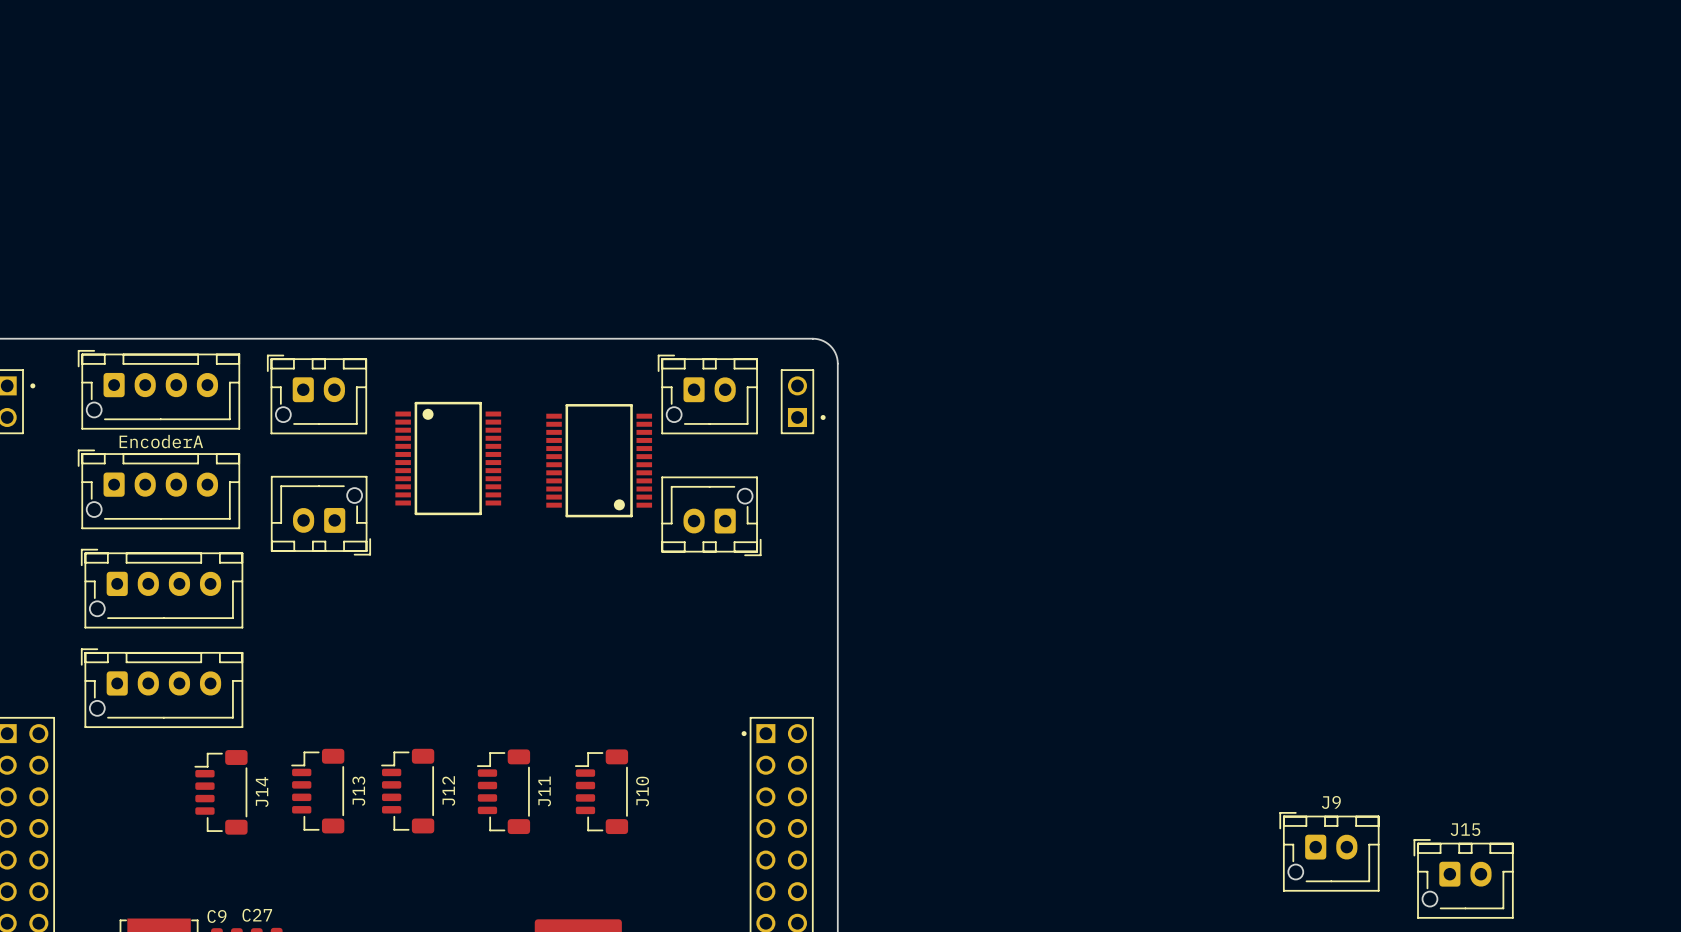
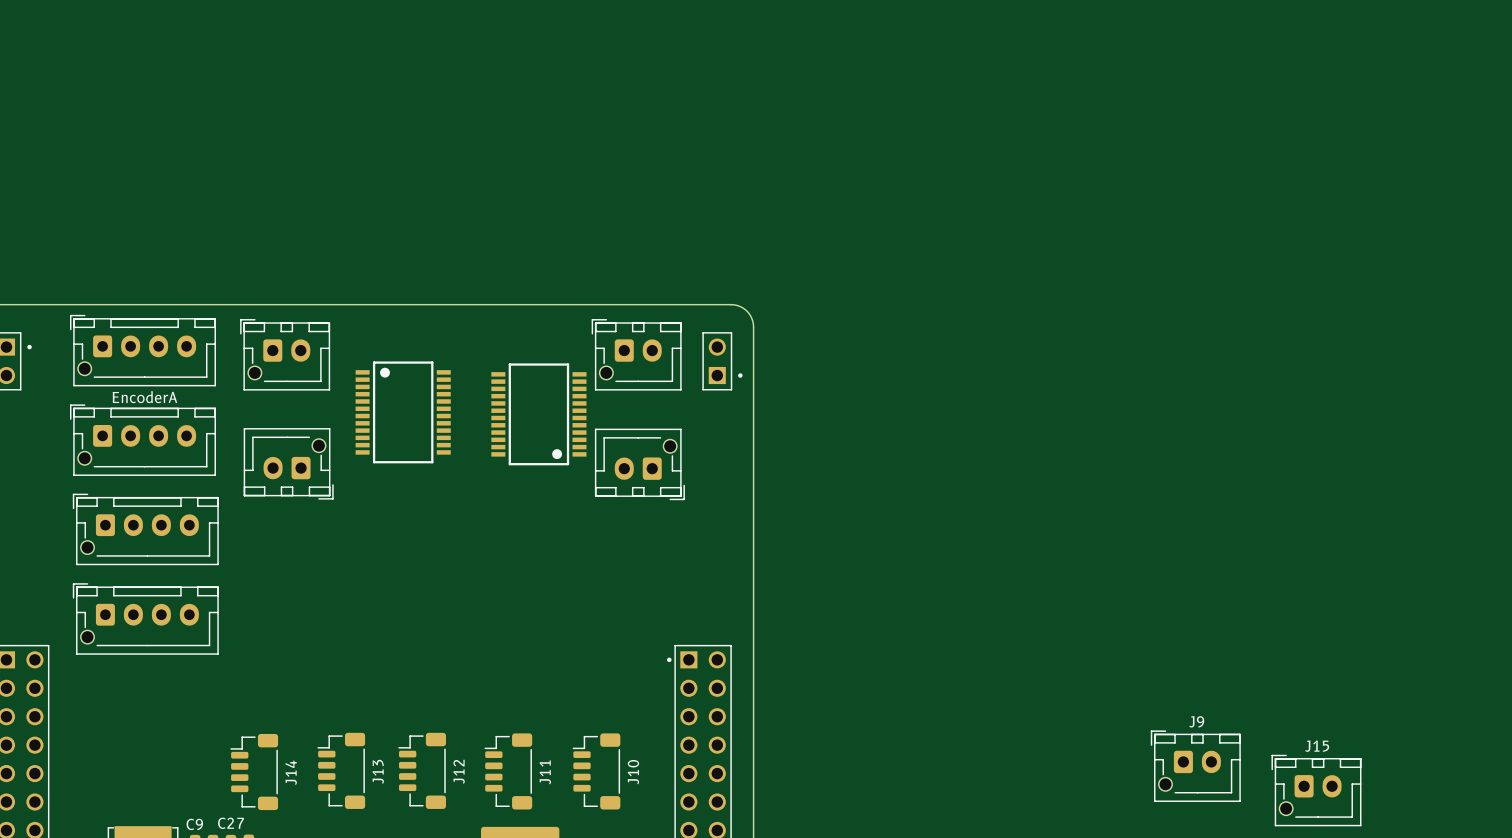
J13 position: (317, 791) -> (341, 770)
J12 position: (407, 791) -> (422, 770)
J11 position: (503, 791) -> (508, 771)
J10 position: (601, 791) -> (596, 771)
J14 position: (221, 792) -> (254, 772)

